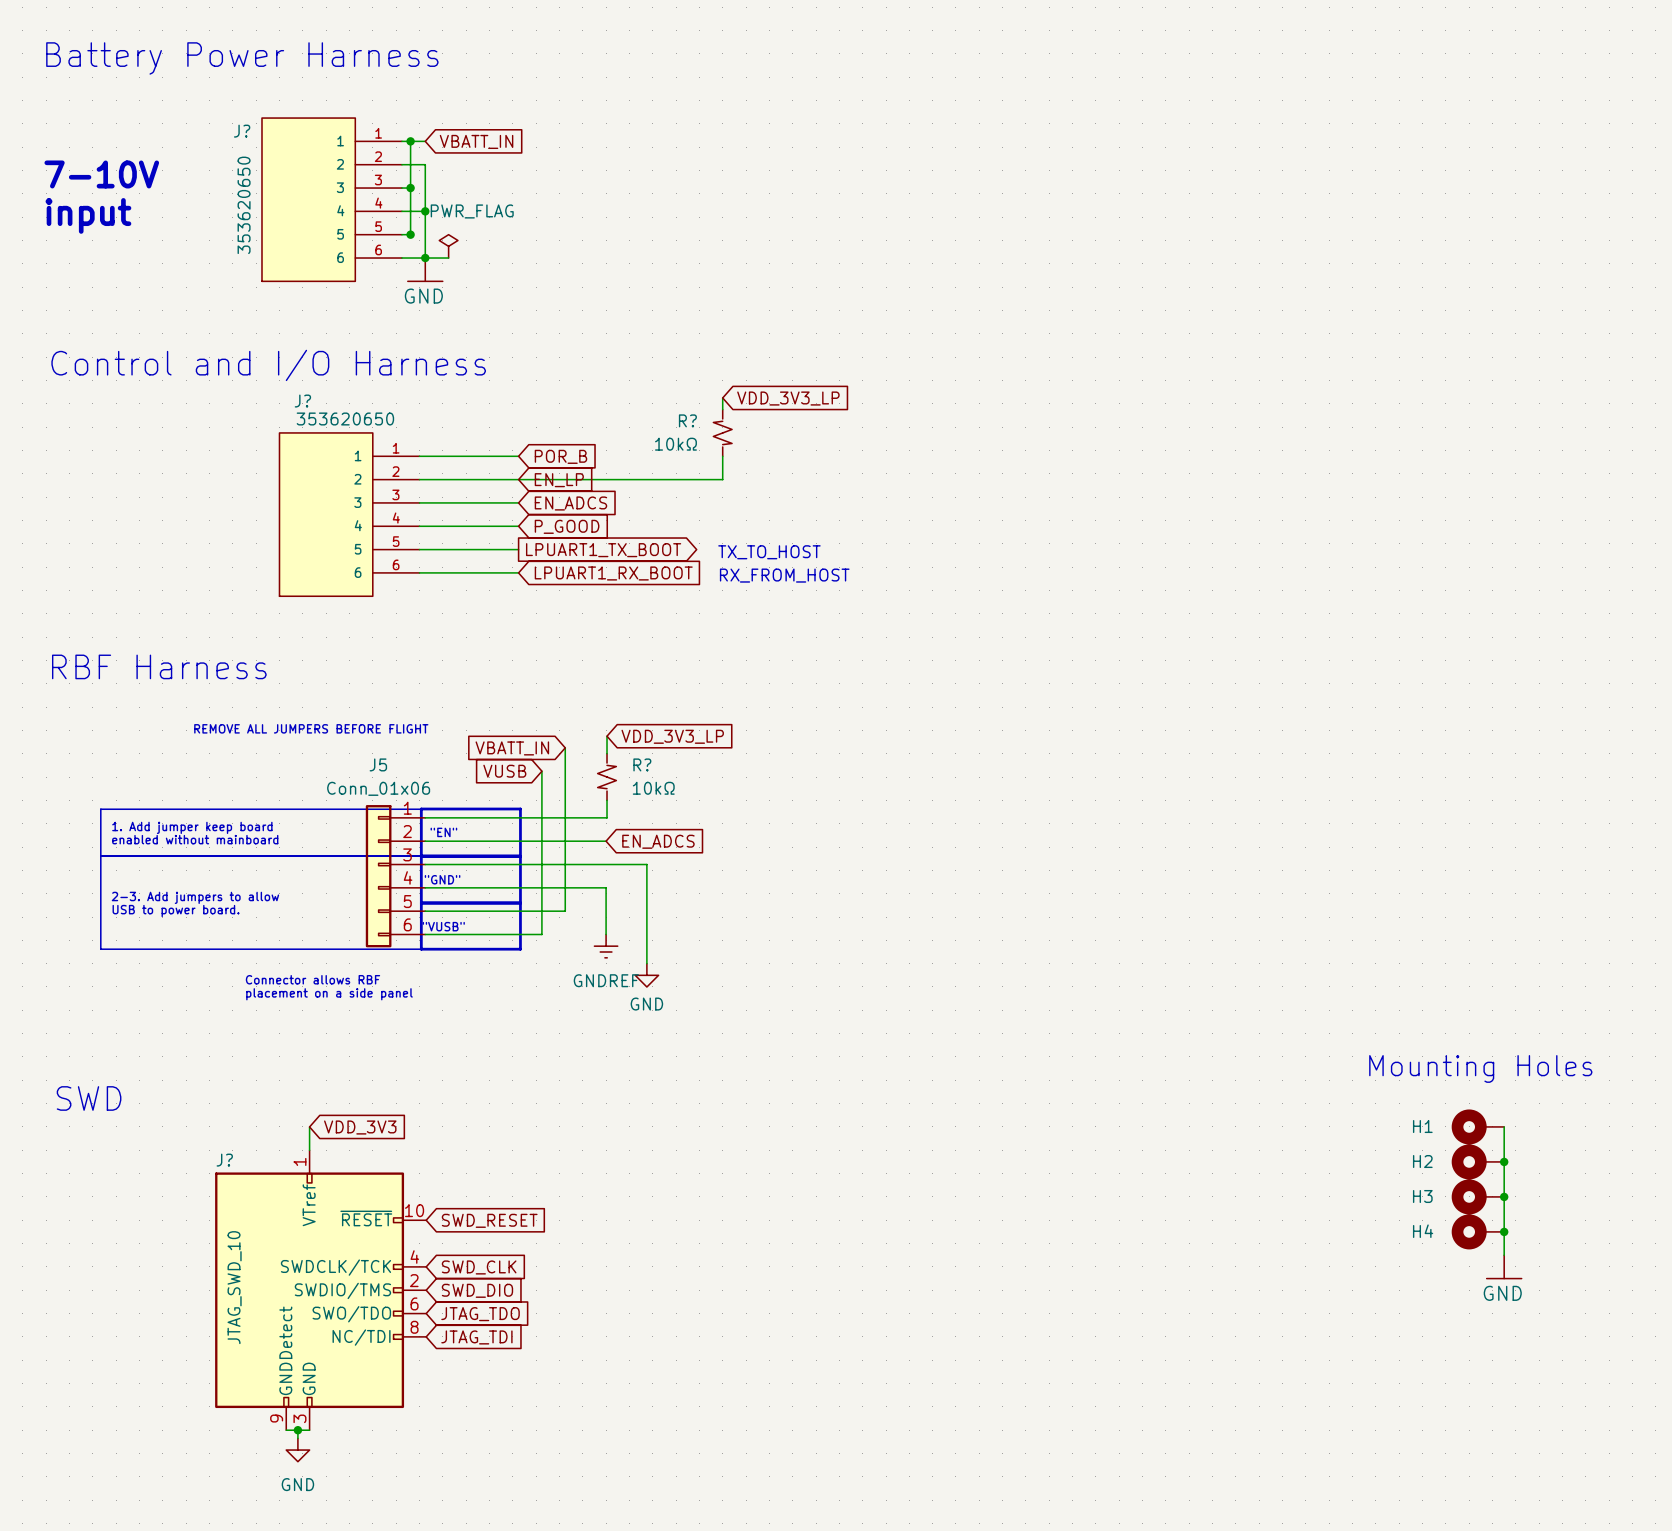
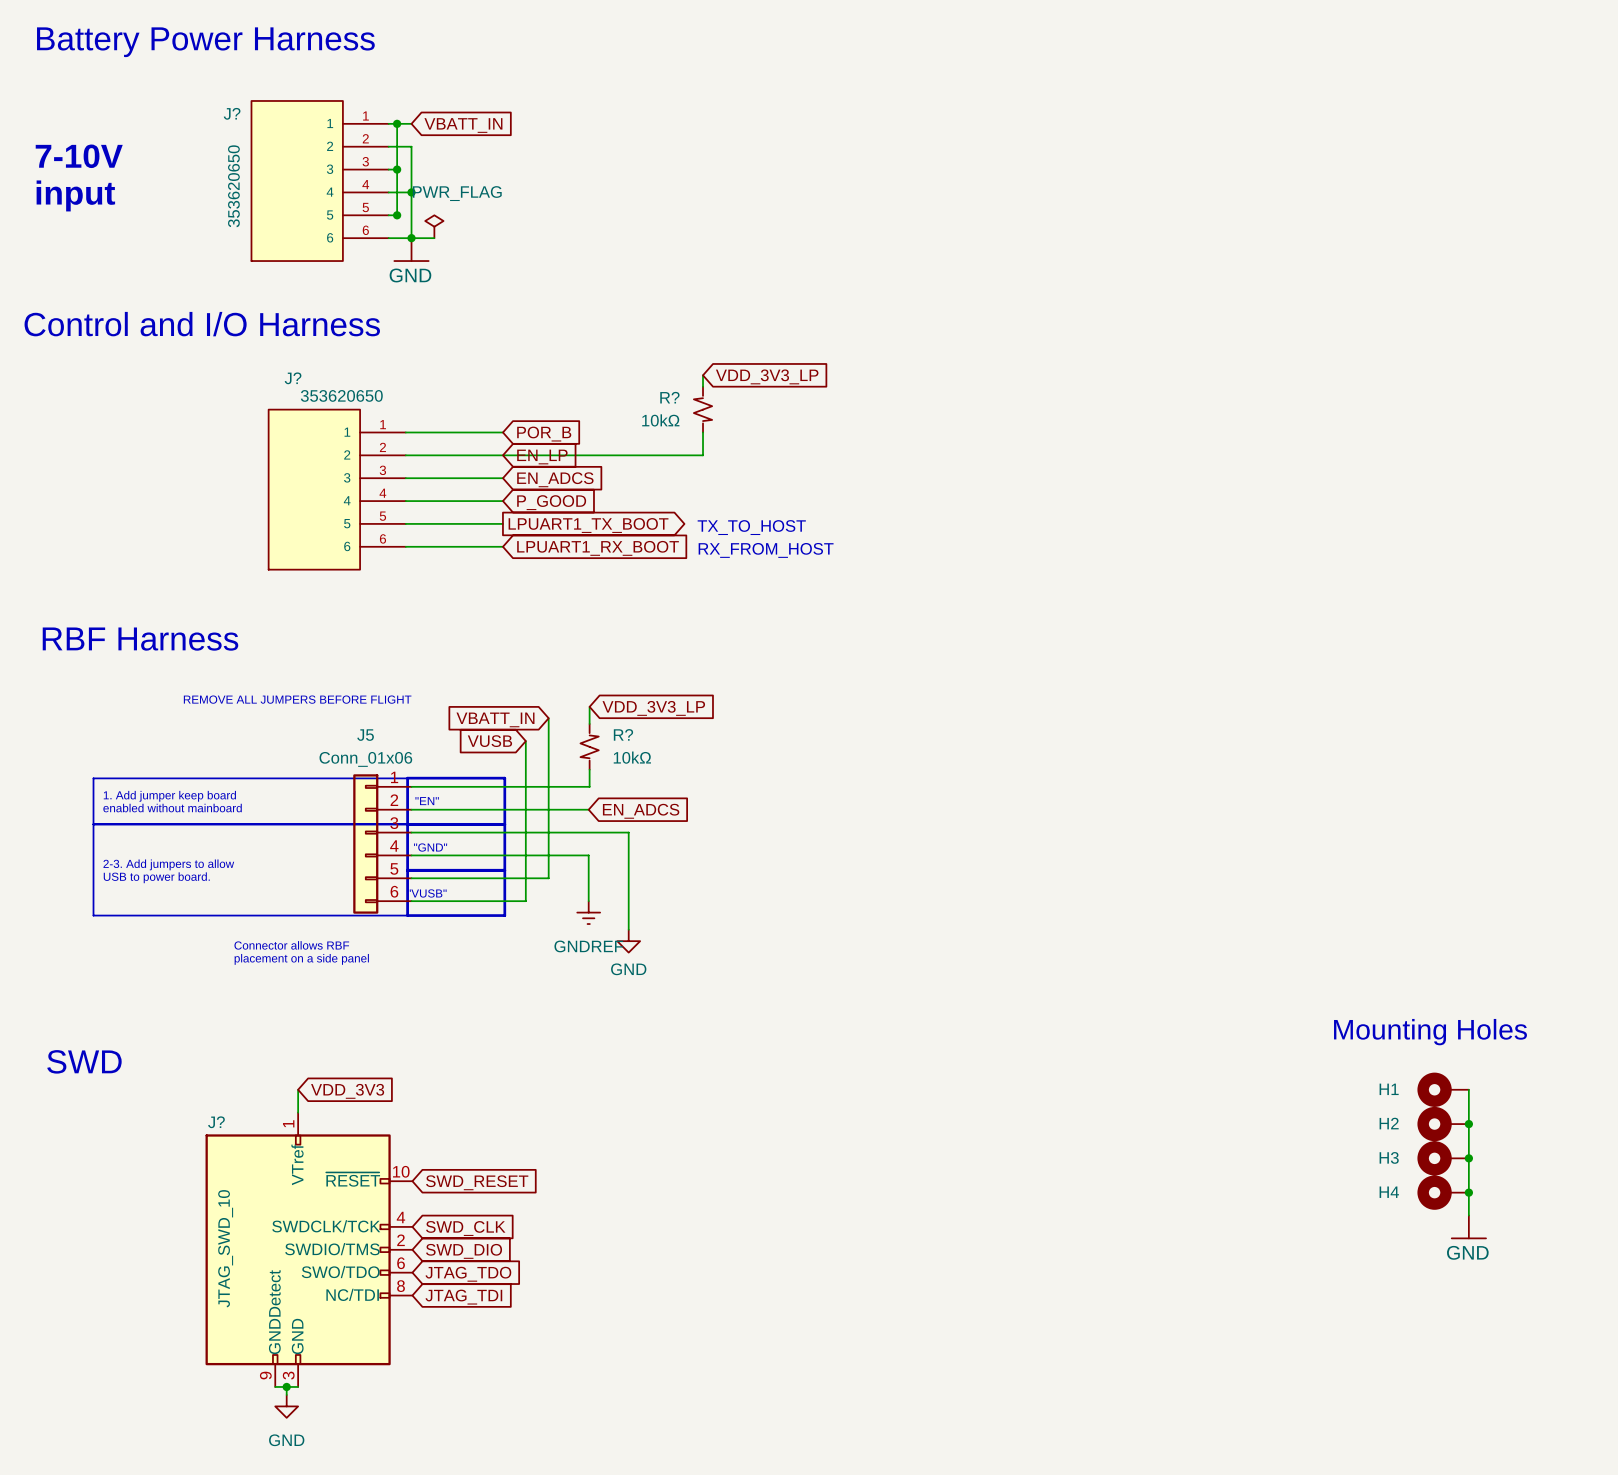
text position: Control and I/O Harness (268, 365) -> Control and I/O Harness (202, 324)

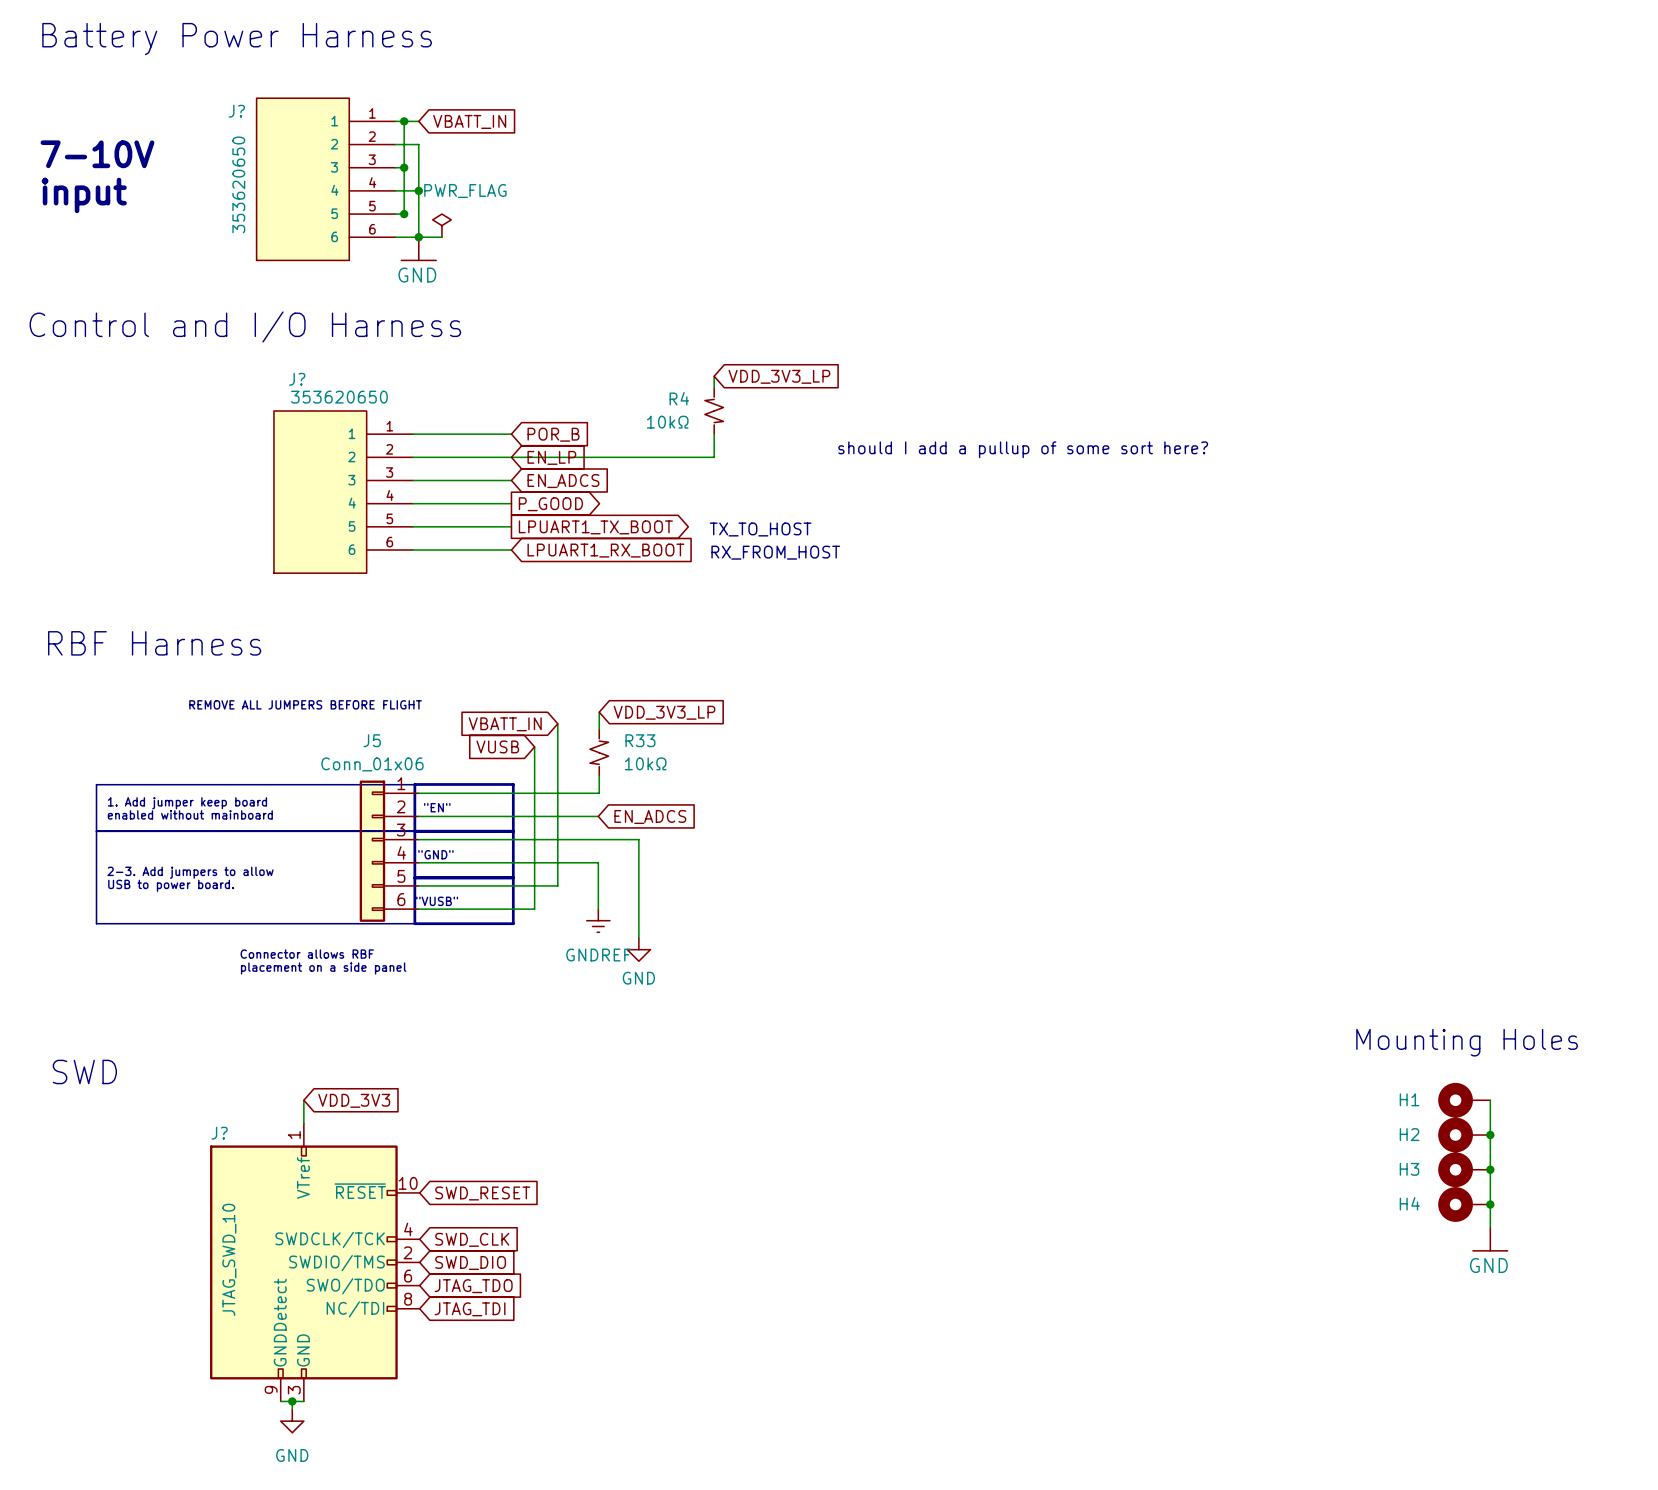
R? name: R? (669, 397) -> R4 (679, 398)
text: none -> should I add a pullup of some sort here? (1023, 449)
global label shape: input (551, 502) -> output (550, 504)
R? name: R? (623, 734) -> R33 (640, 740)

